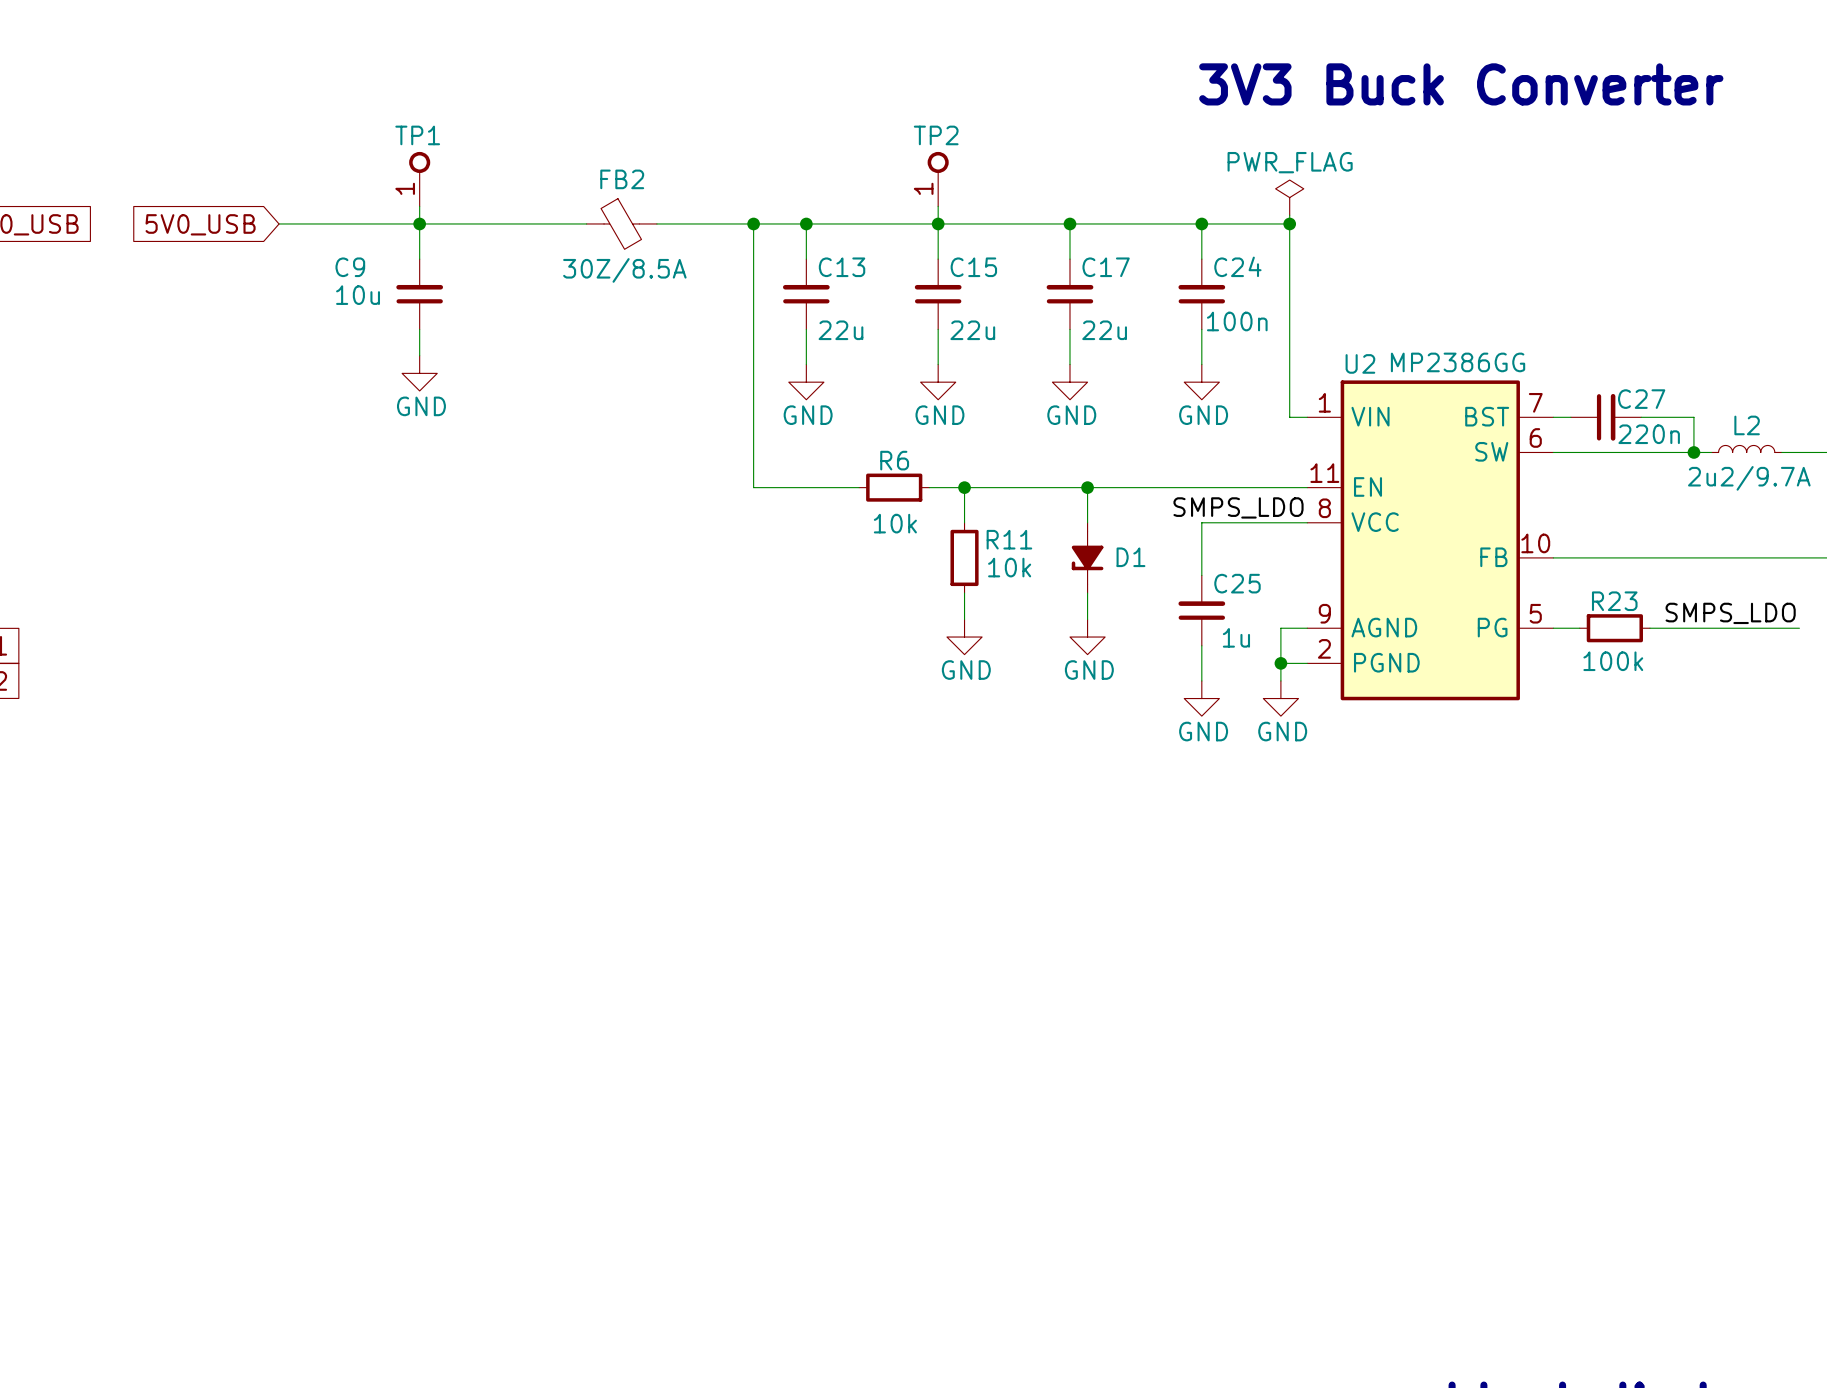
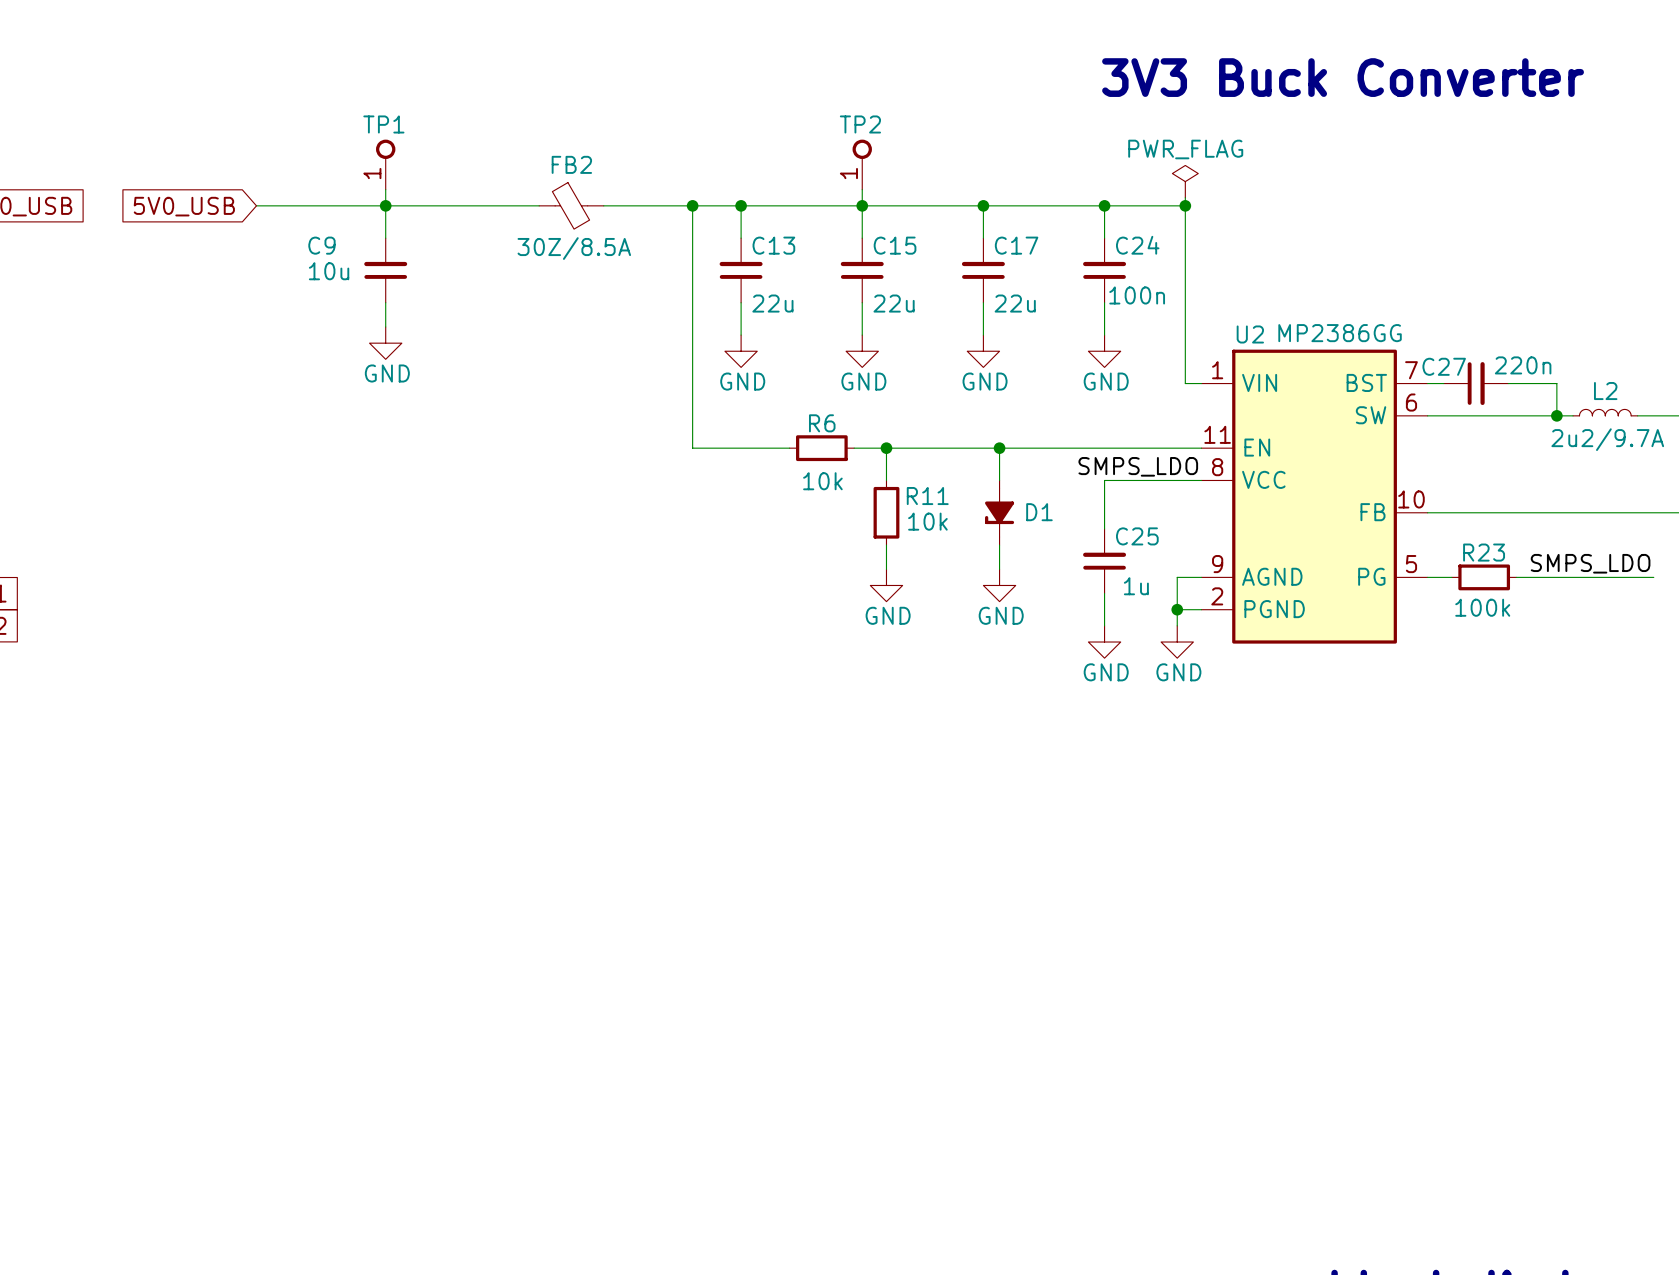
C27 name position: C27 (1641, 399) -> C27 (1444, 366)
C27 text position: 220n (1649, 434) -> 220n (1523, 365)

